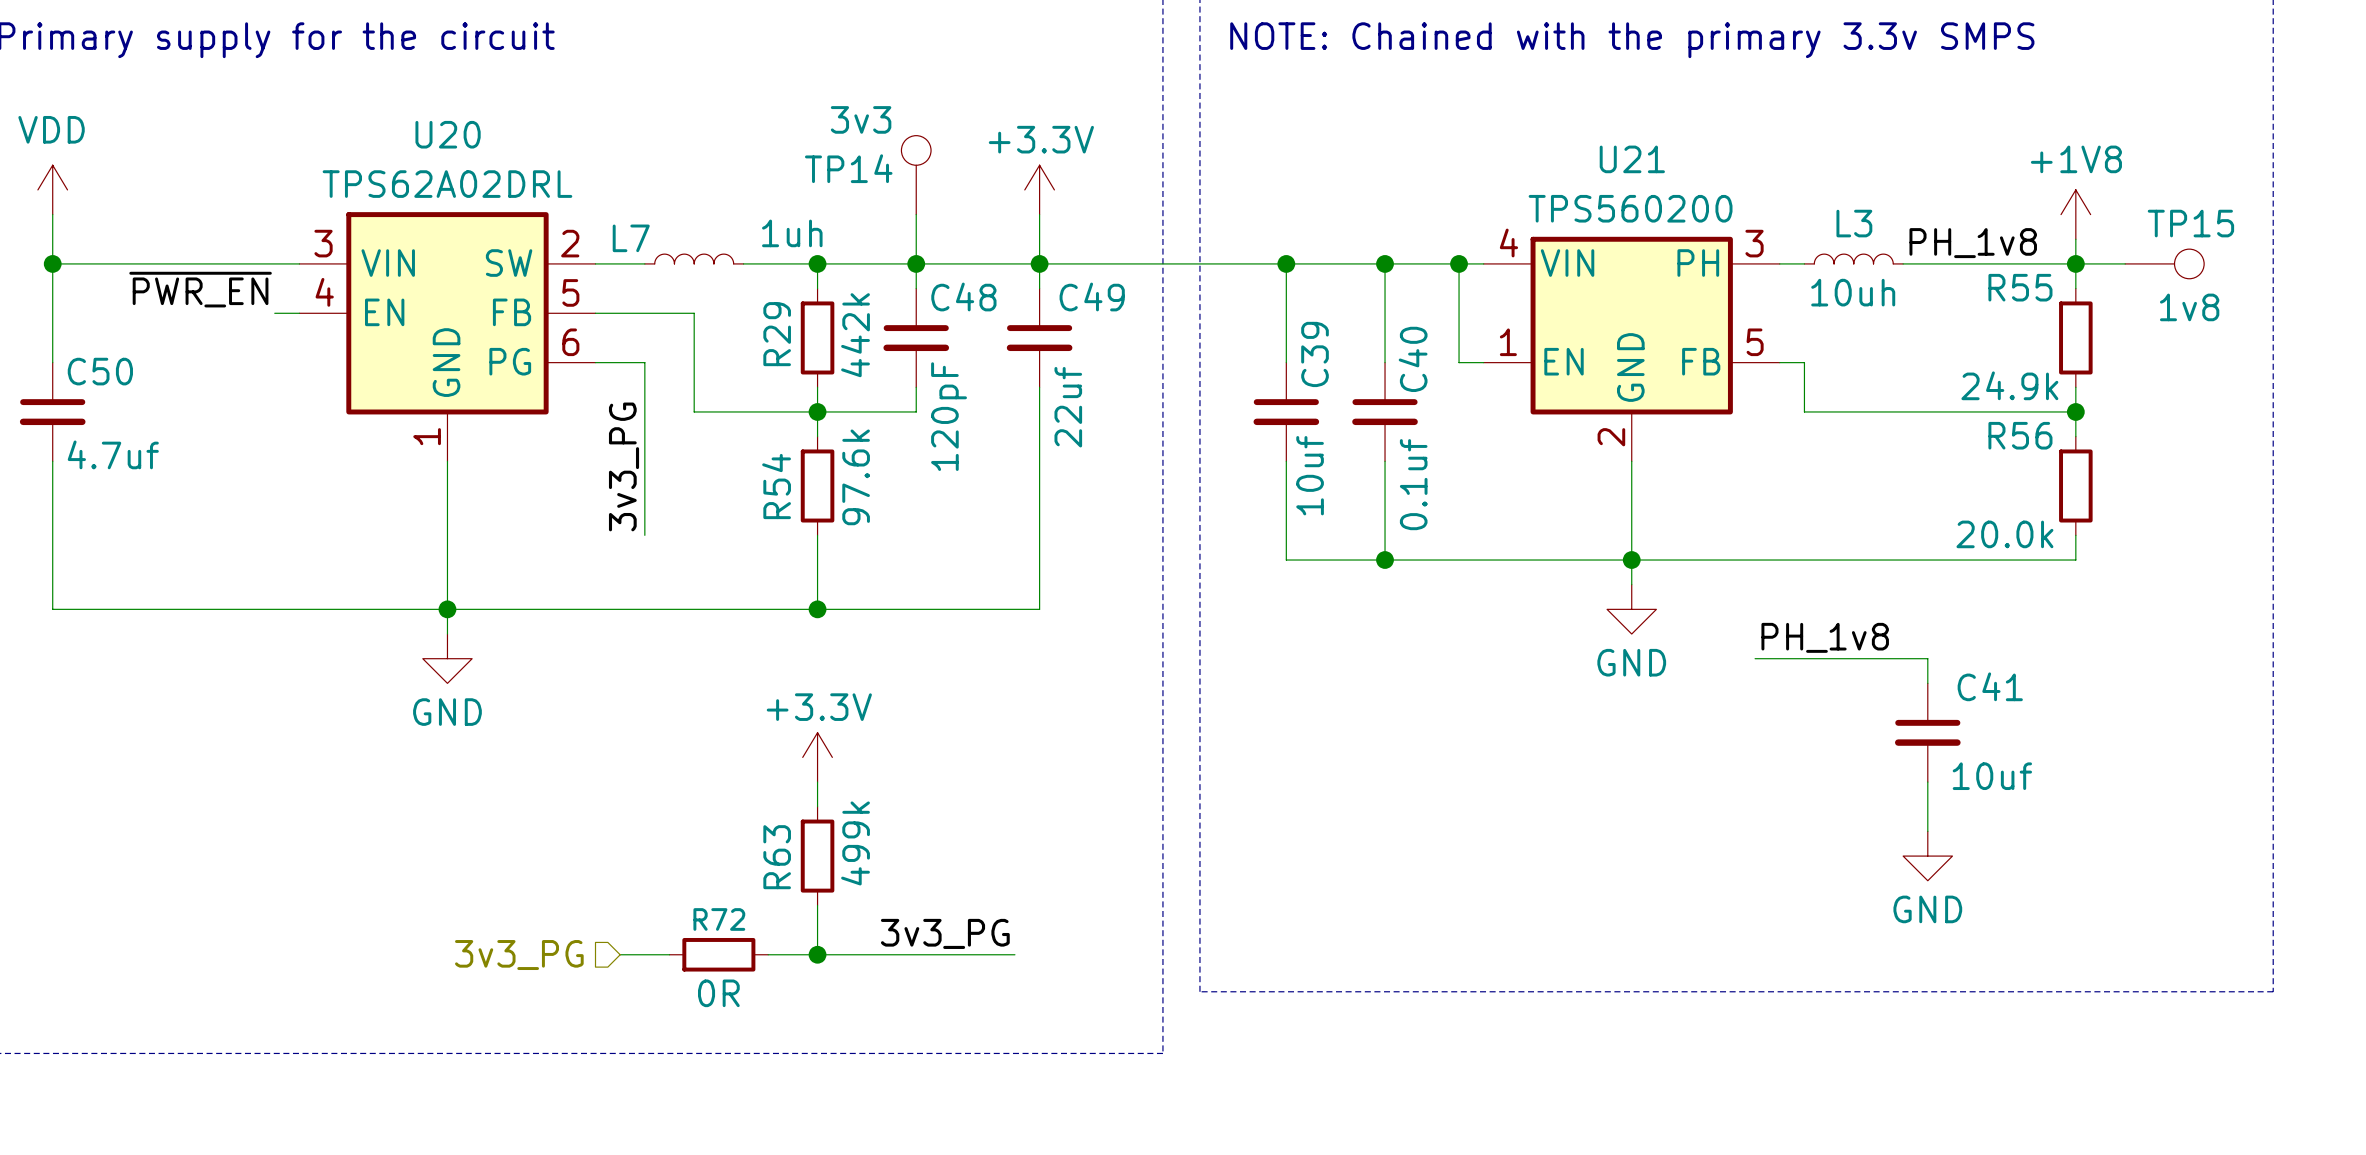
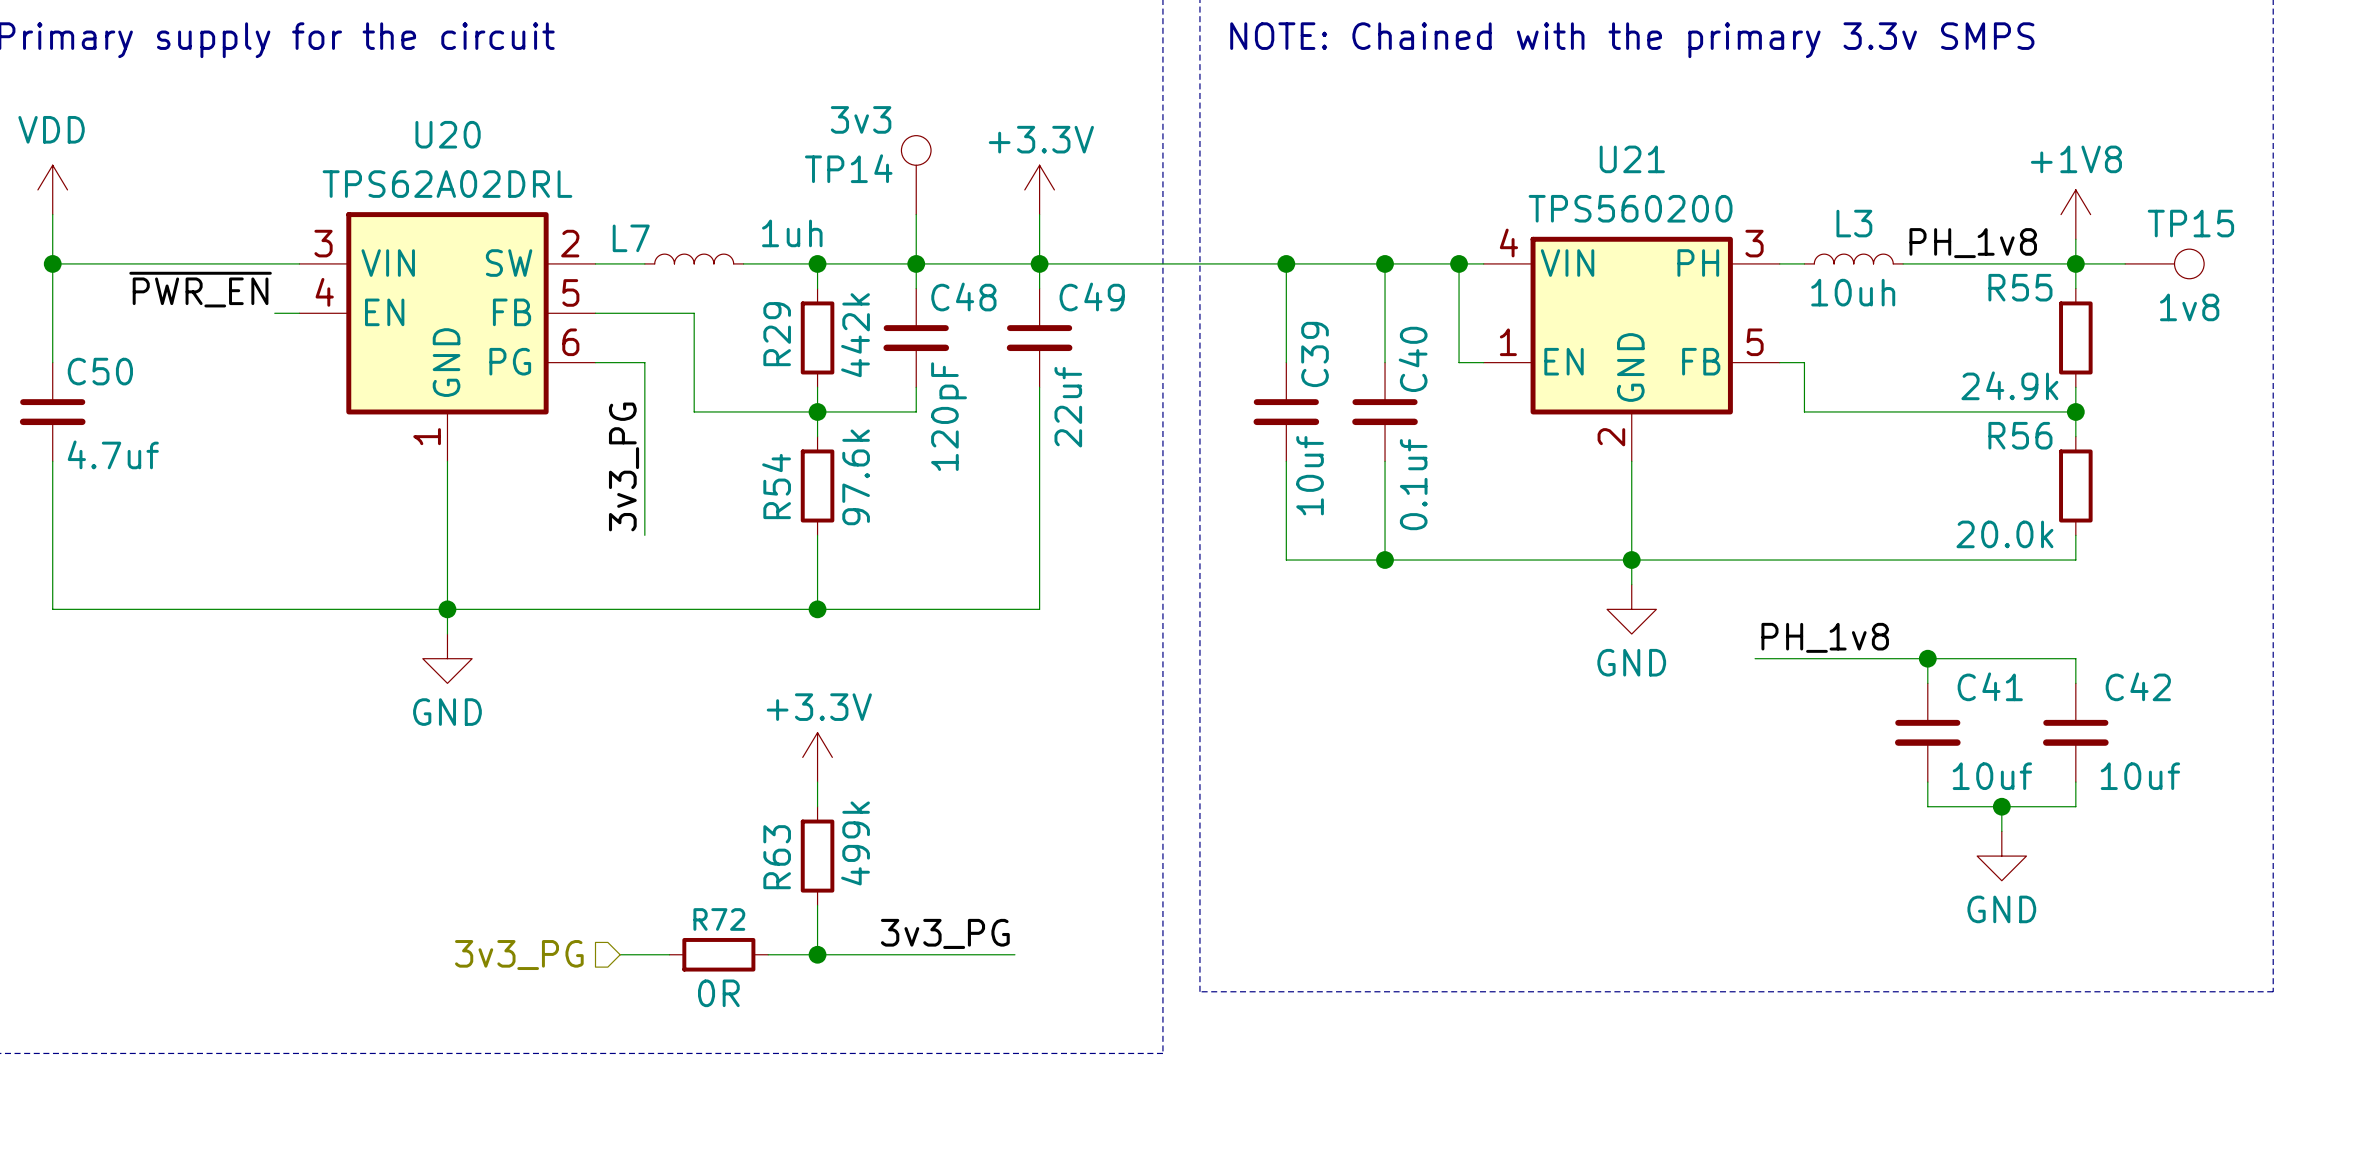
wire: none -> (1927, 658) (2075, 658) (2075, 683)
junction: none -> (1927, 658)
C42: none -> 10uf (2075, 732)
wire: (1927, 806) (1927, 831) -> (1927, 806) (2075, 806) (2075, 782)
wire: none -> (2001, 806) (2001, 831)
junction: none -> (2001, 806)
power symbol position: GND (1927, 856) -> GND (2001, 856)

